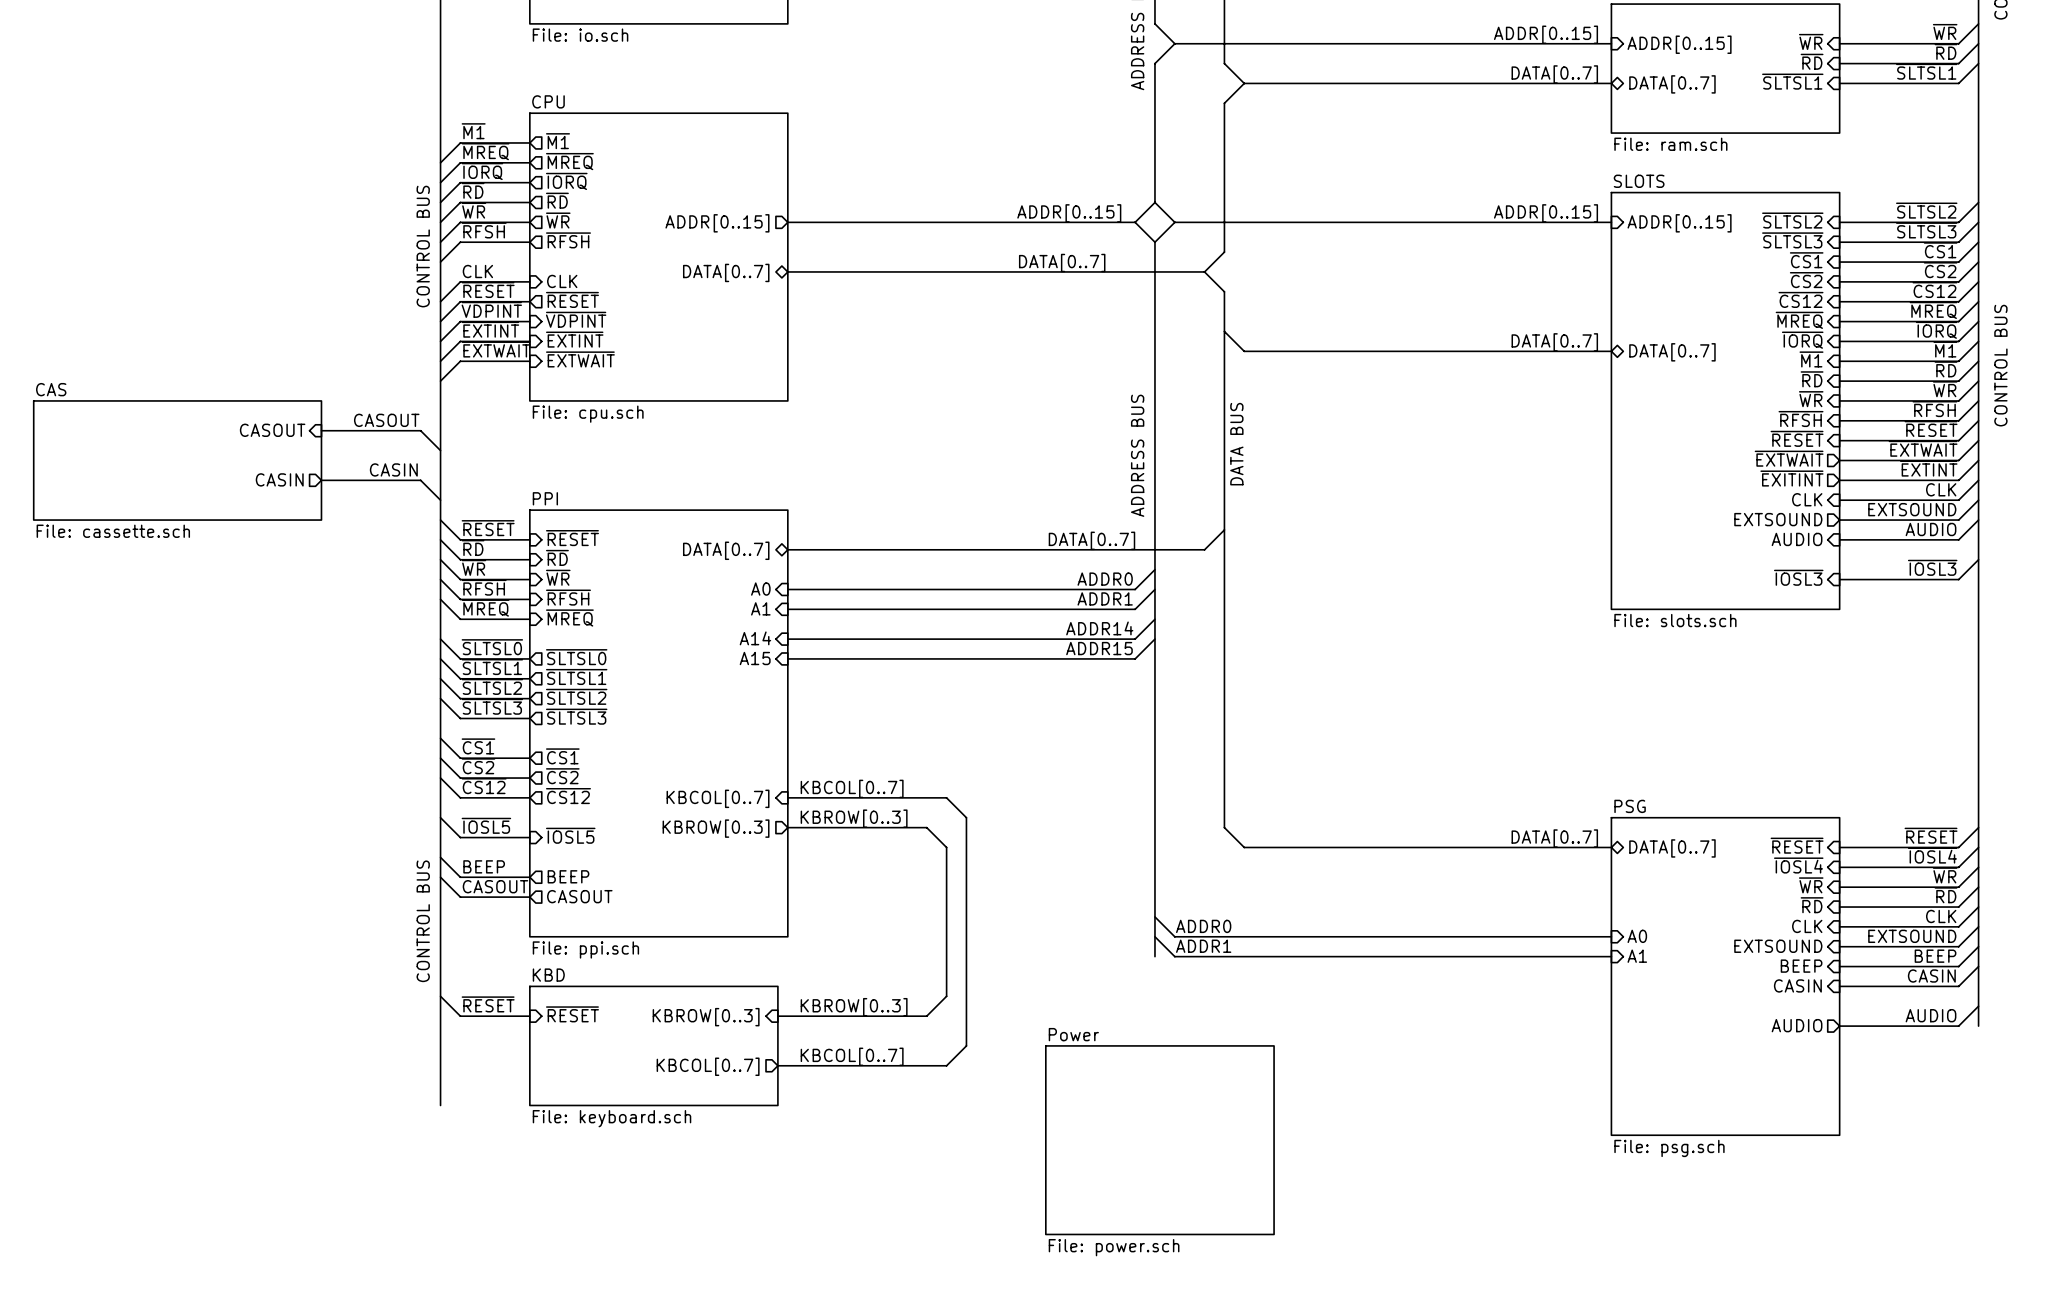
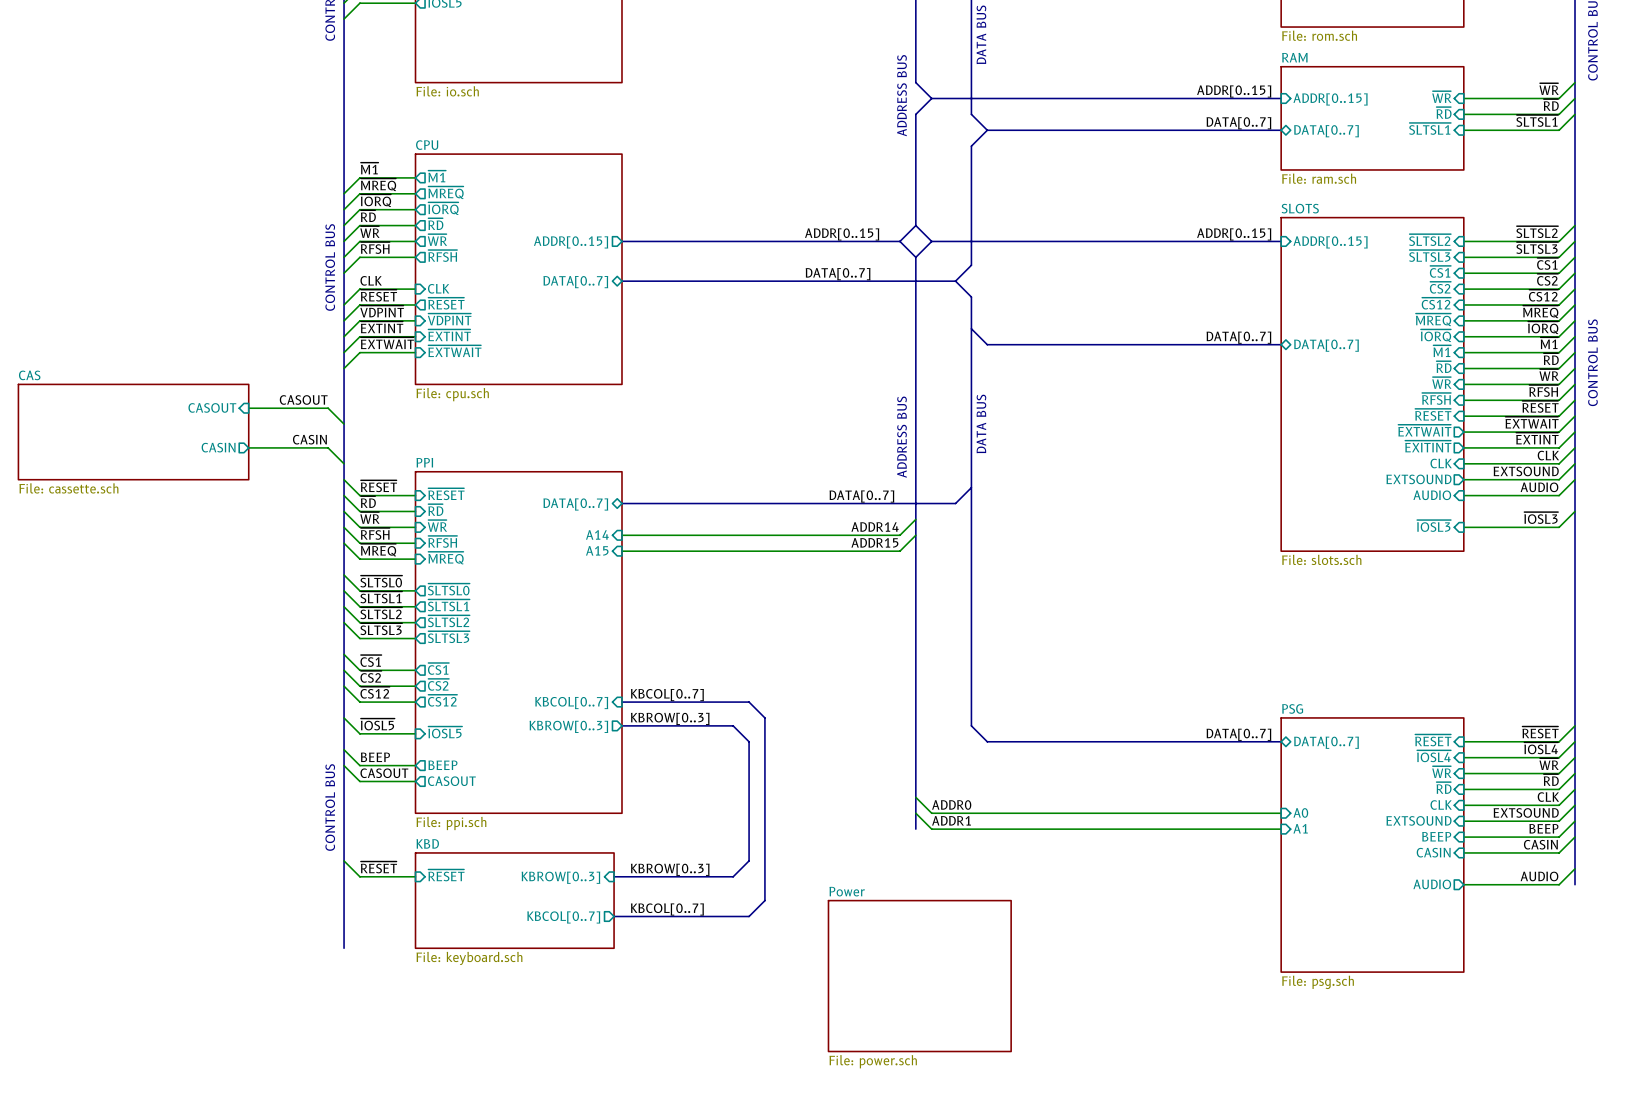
label: ADDR0 (1105, 579) -> ADDR14 (875, 526)
sheet pin: A0 (760, 589) -> A14 (597, 534)
label: ADDR1 (1105, 598) -> ADDR15 (874, 542)
sheet pin: A1 (760, 608) -> A15 (597, 550)
wire: (1154, 619) (1135, 639) (787, 639) -> none
label: ADDR14 (1099, 628) -> none
sheet pin: A14 (755, 638) -> none
wire: (1154, 639) (1135, 658) (787, 658) -> none
label: ADDR15 (1099, 648) -> none
sheet pin: A15 (755, 658) -> none

